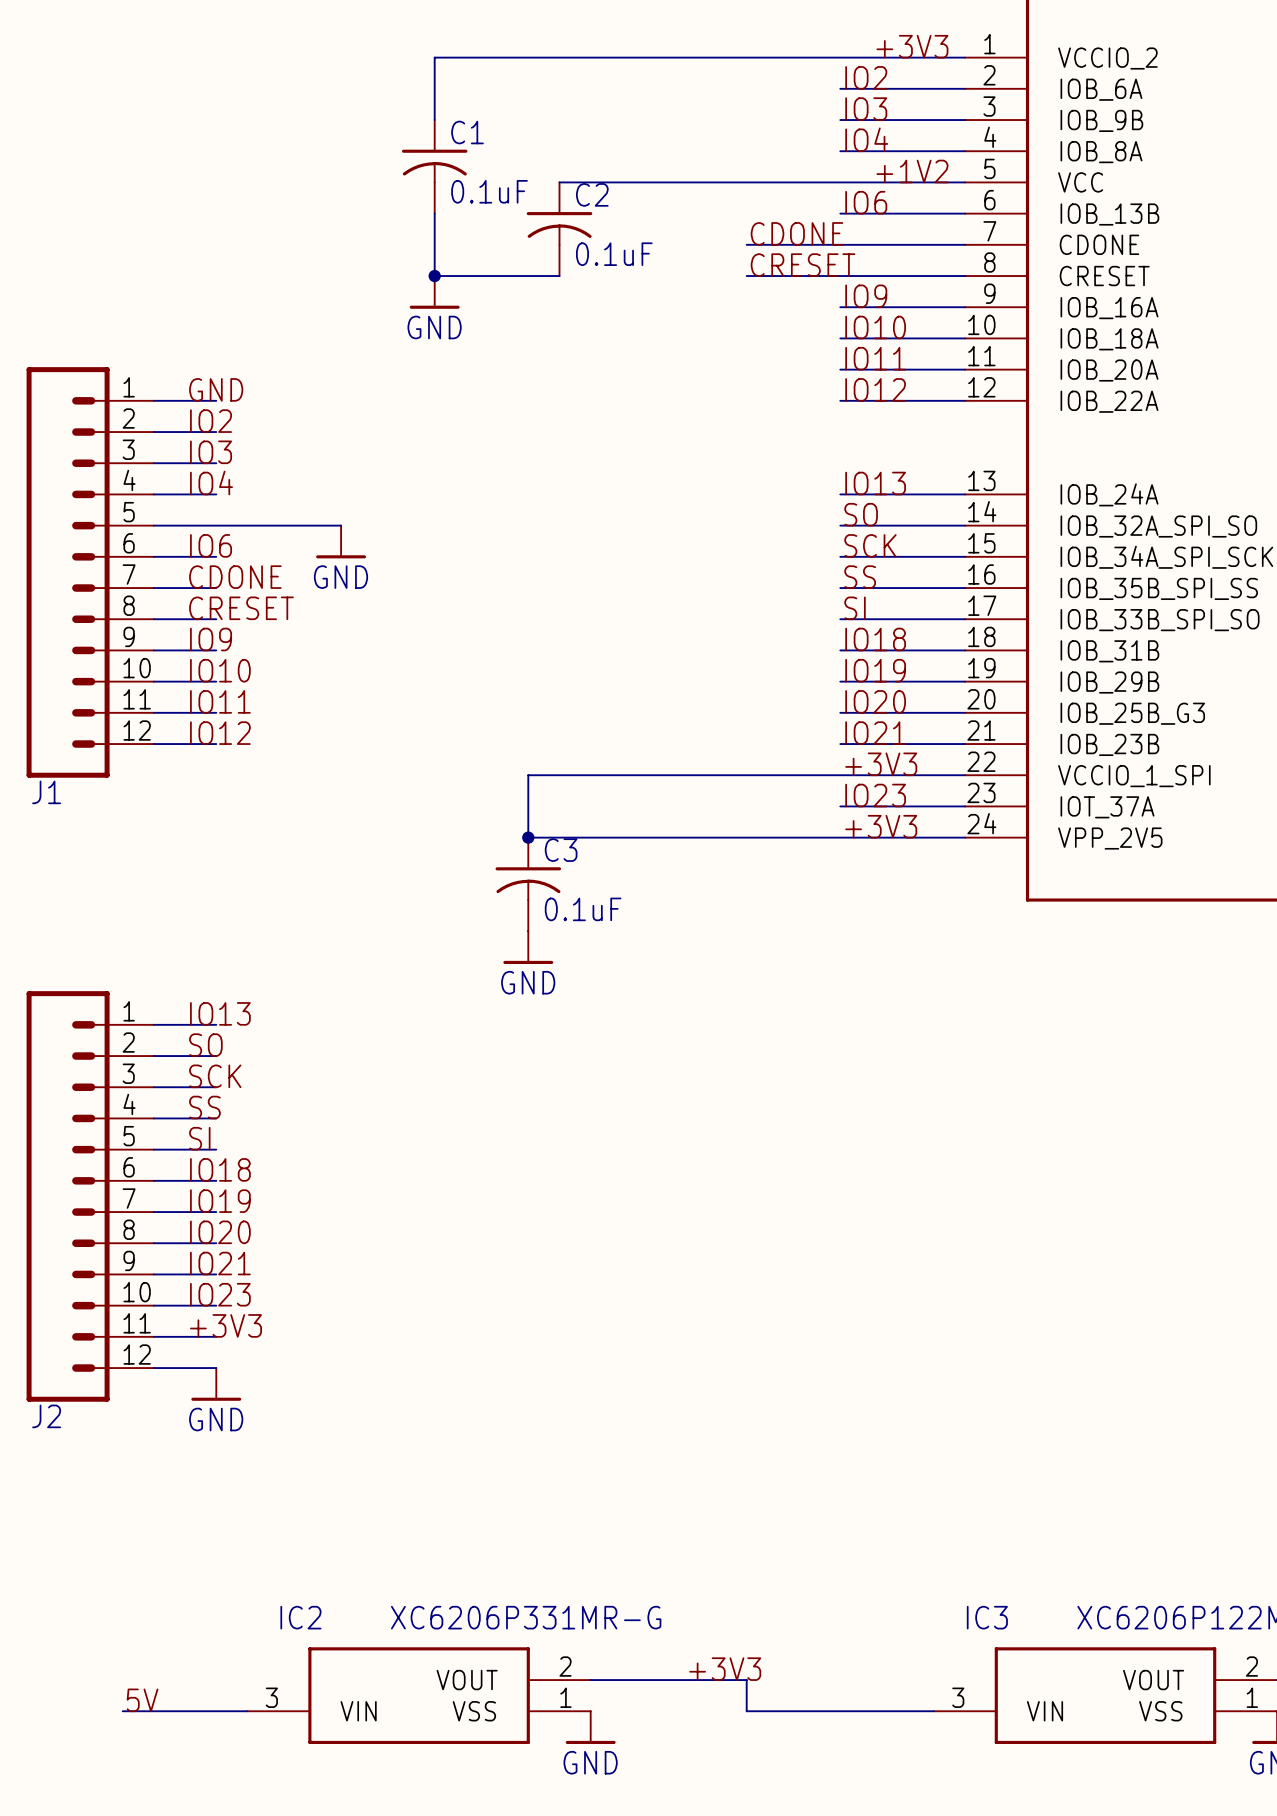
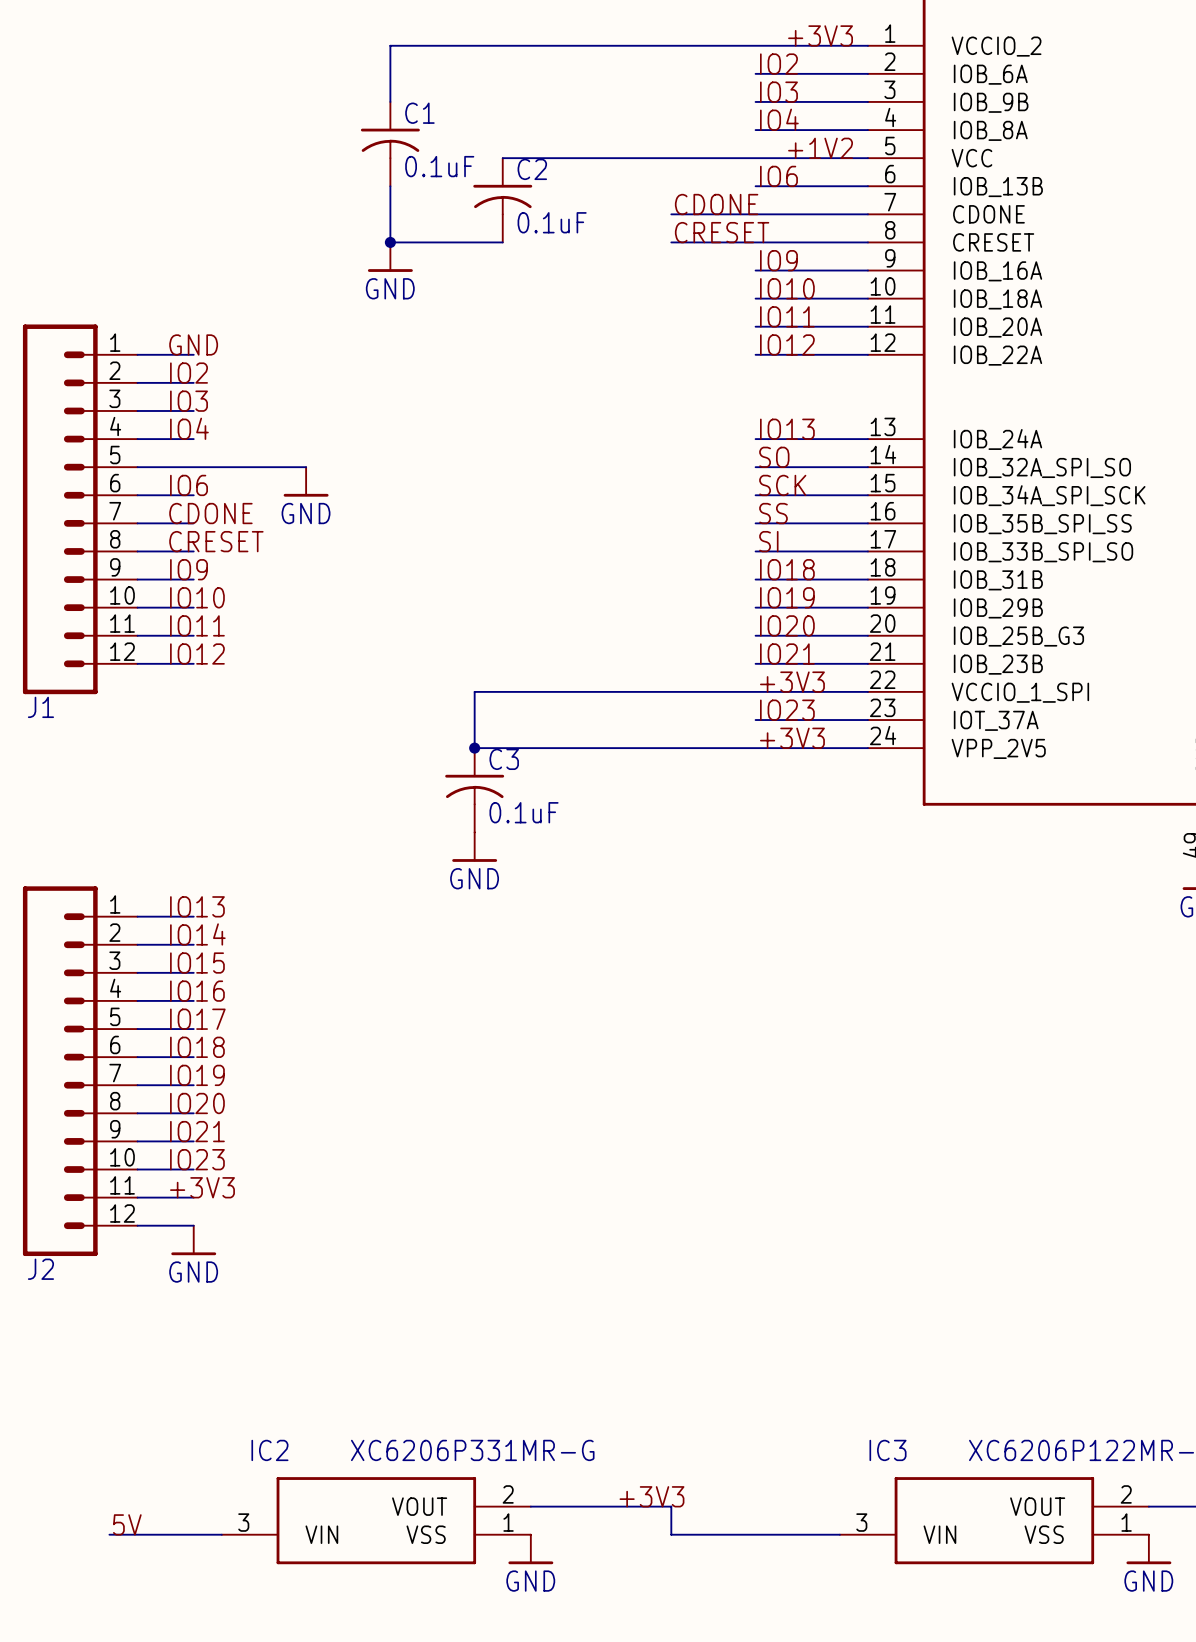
label: SO (205, 1045) -> IO14 (197, 934)
label: SCK (215, 1076) -> IO15 (197, 963)
label: SS (204, 1107) -> IO16 (197, 991)
label: SI (199, 1138) -> IO17 (197, 1019)

